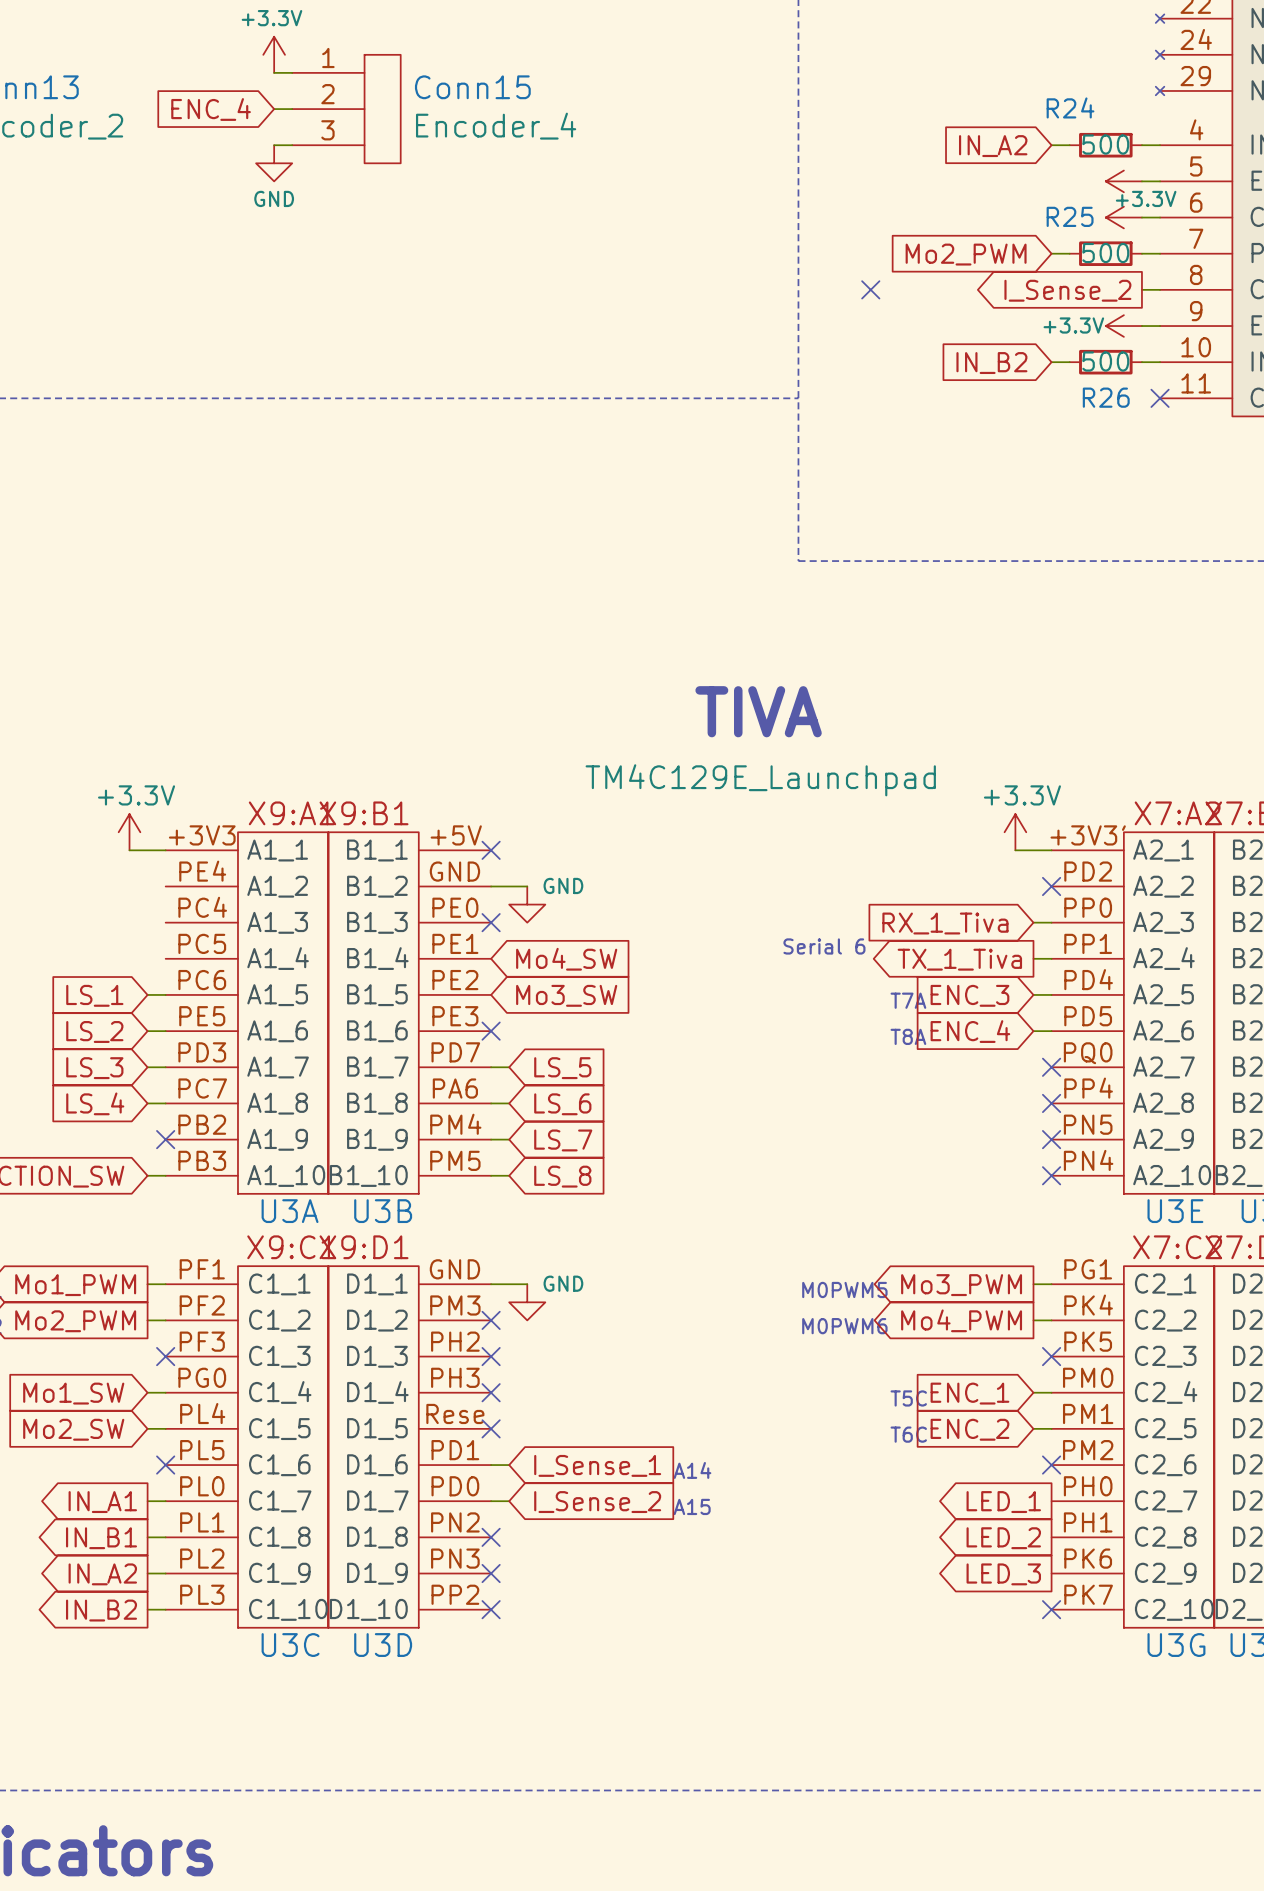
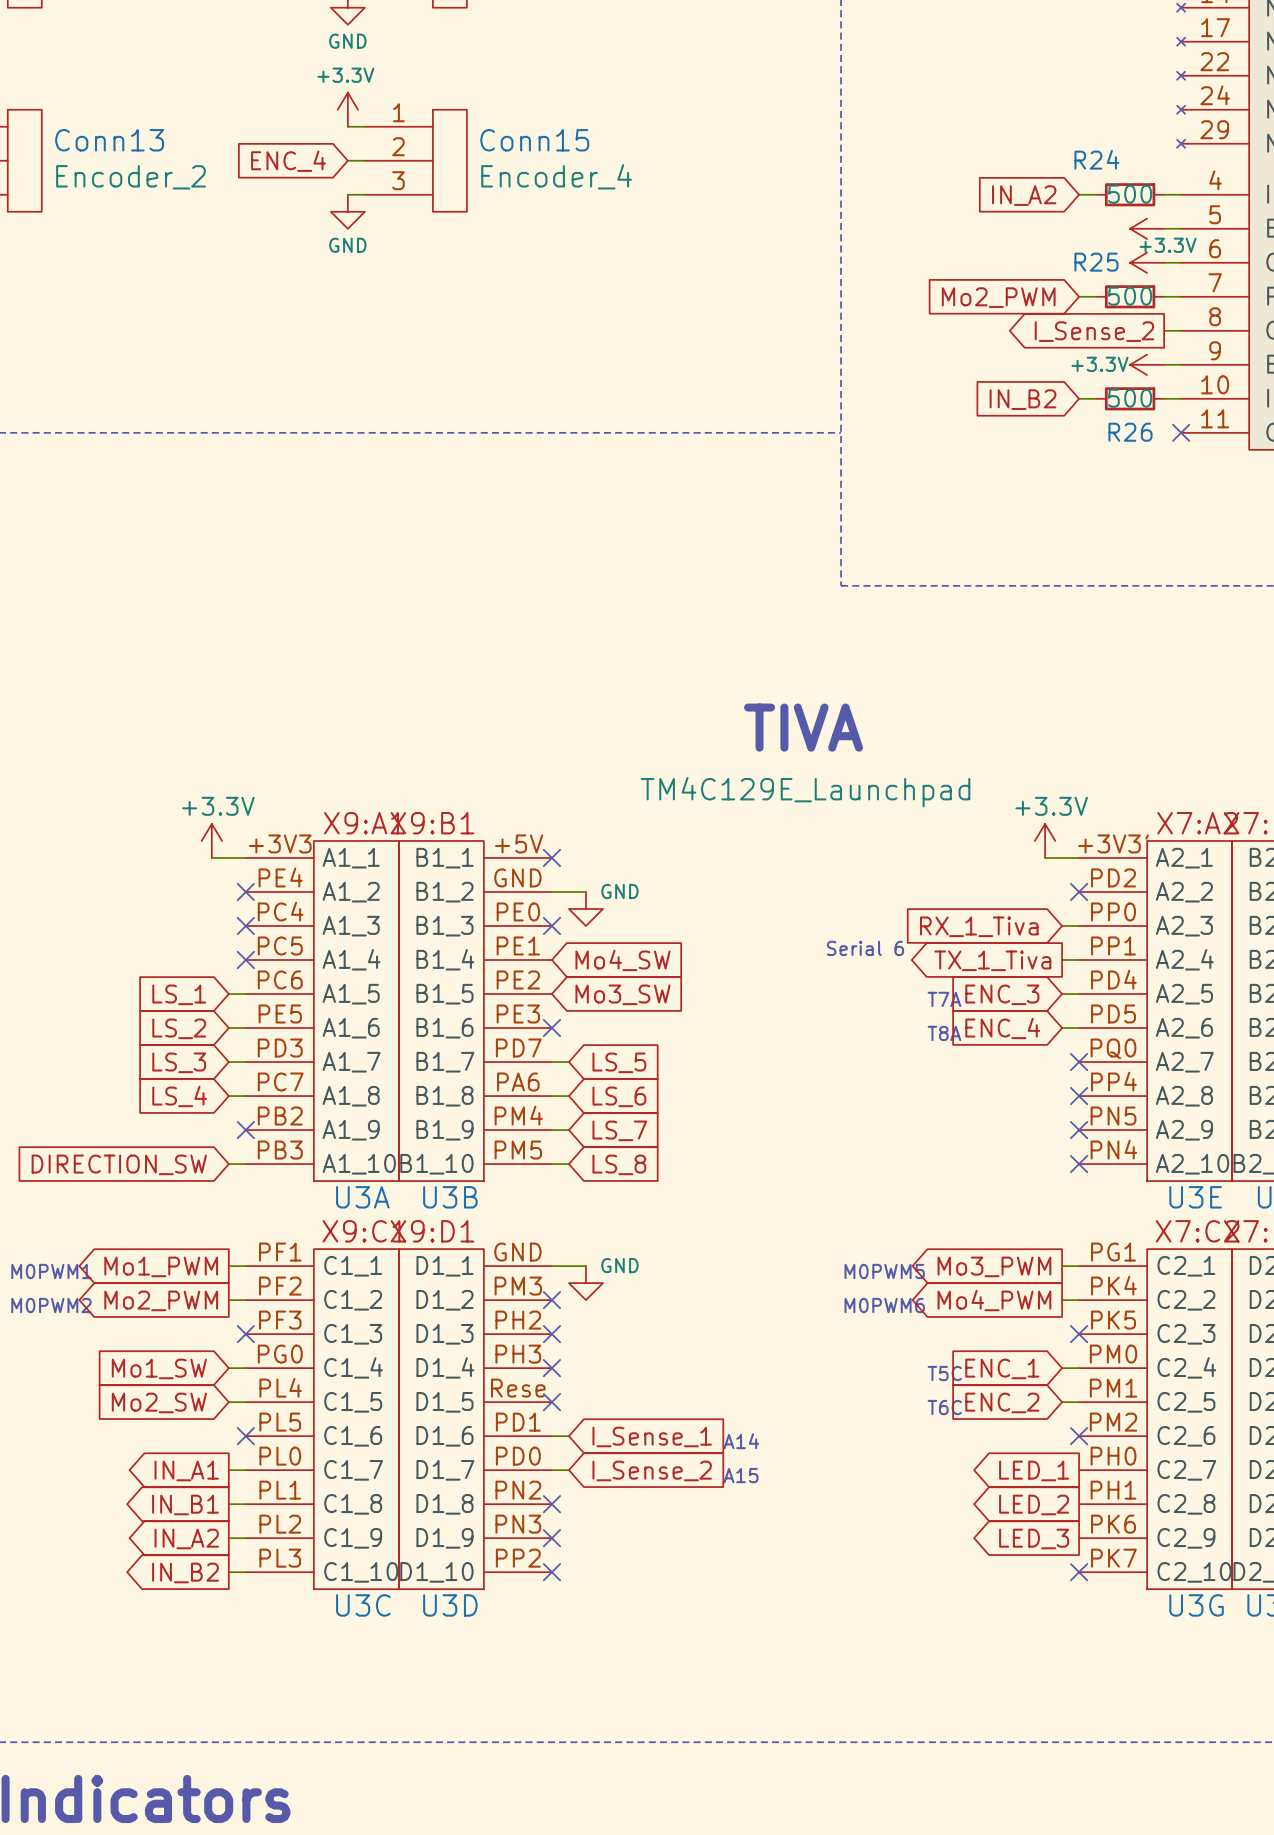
no-connect mark: (870, 289) -> none
no-connect mark: none -> (245, 891)
no-connect mark: none -> (245, 925)
no-connect mark: none -> (245, 960)

